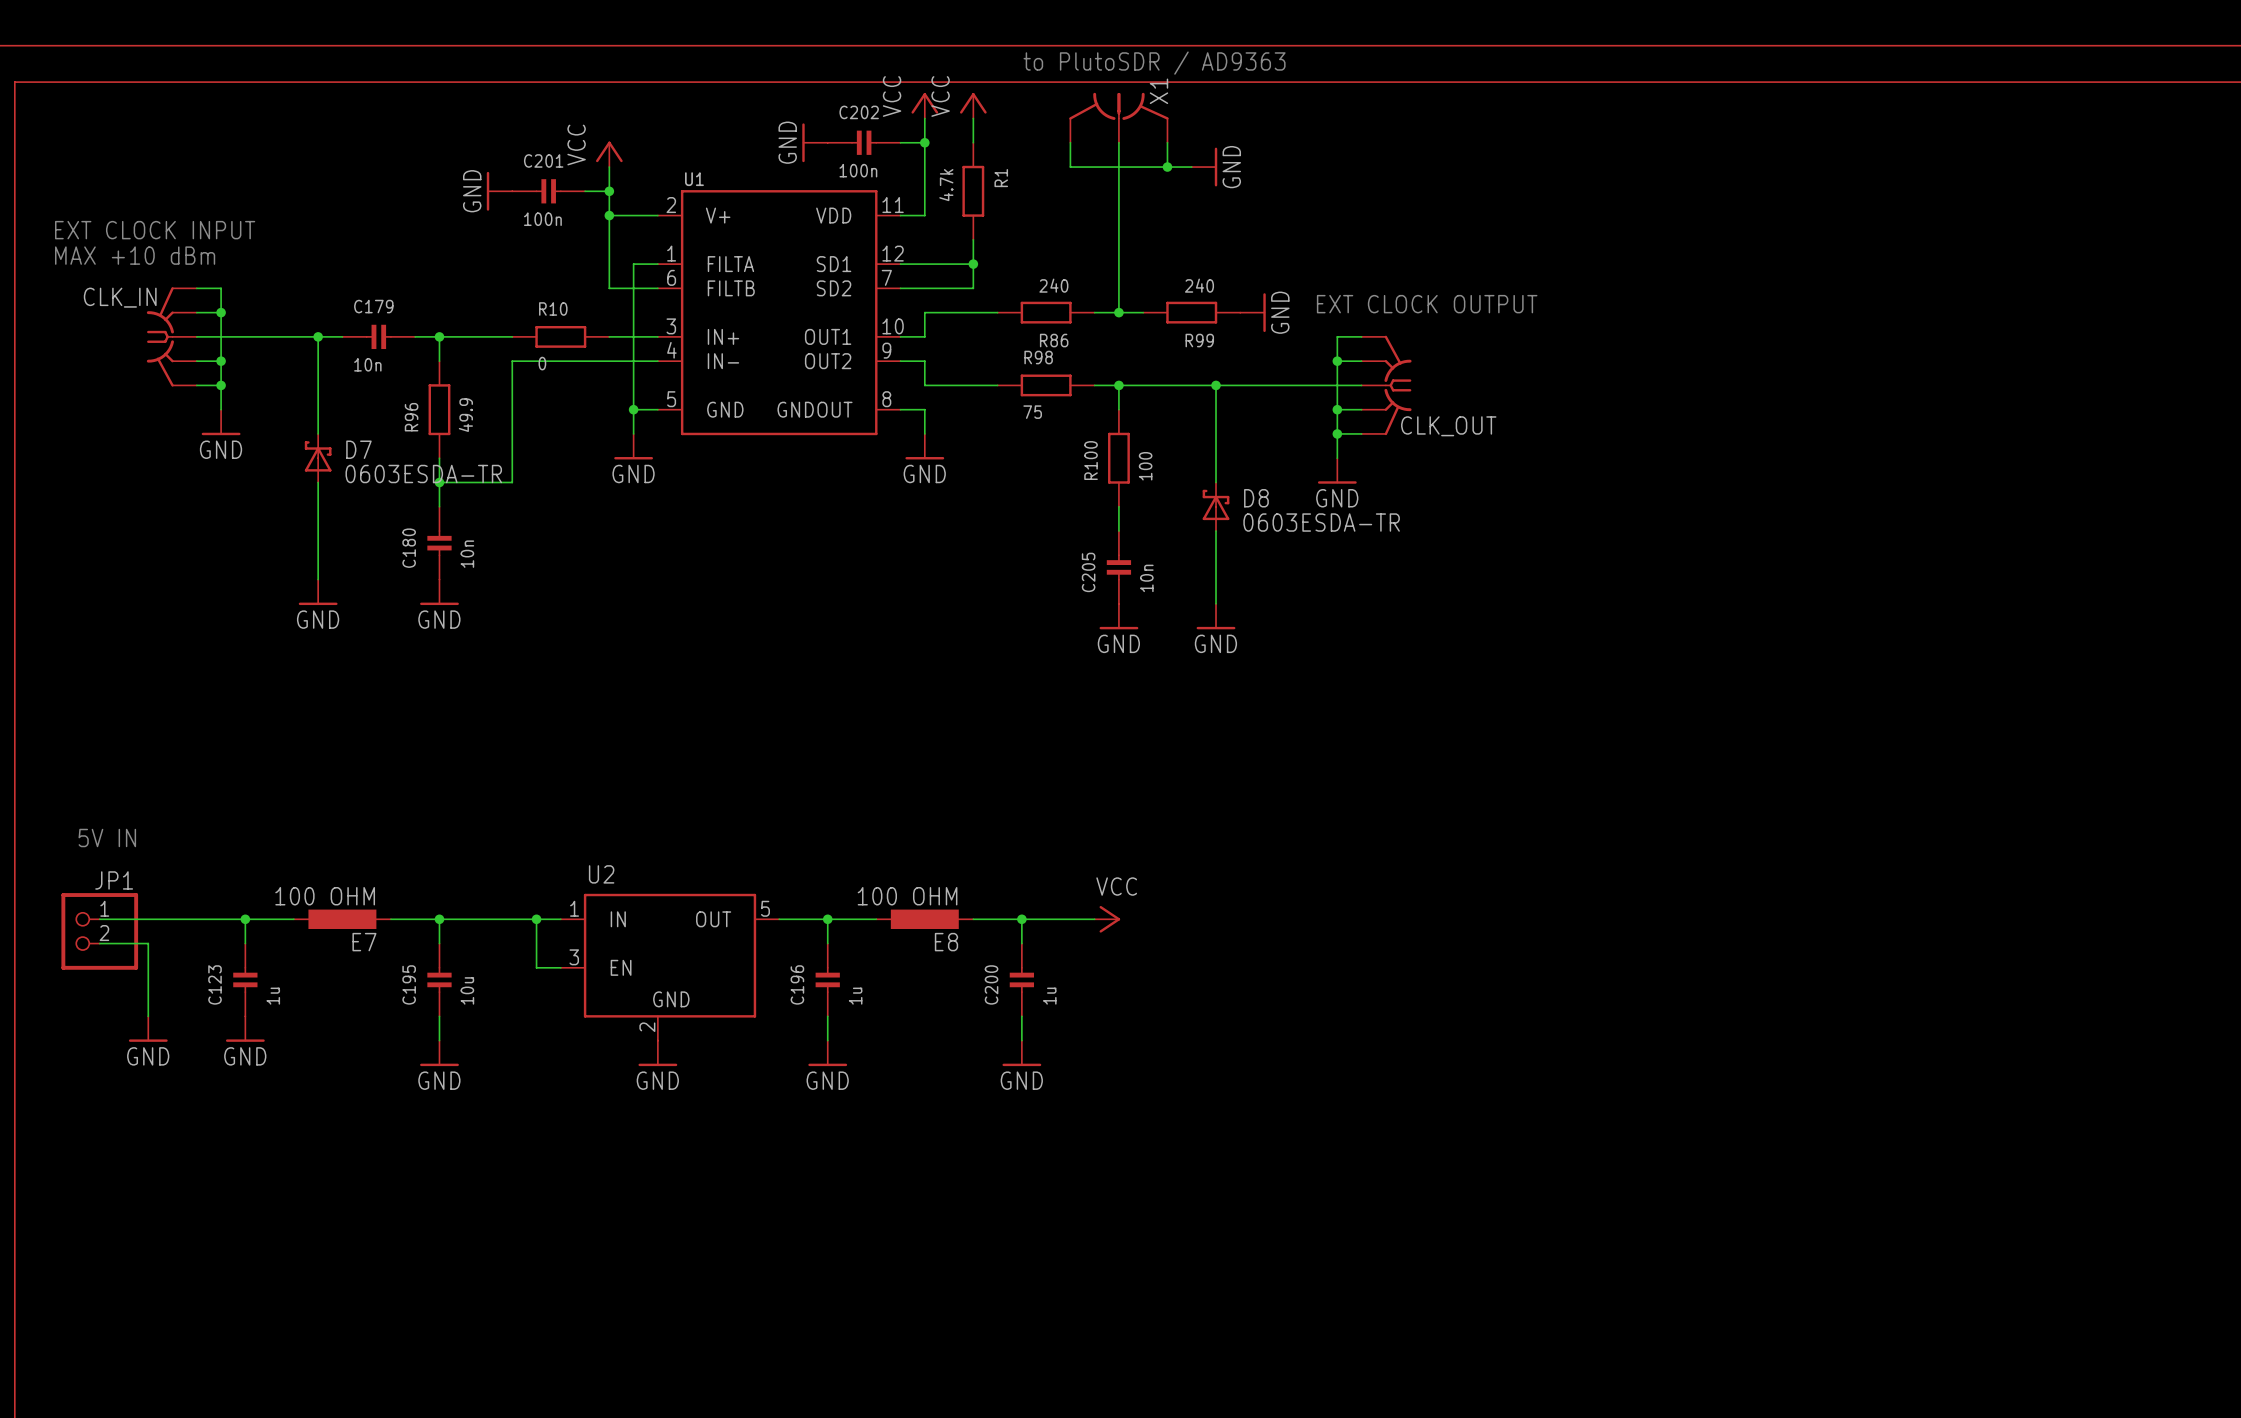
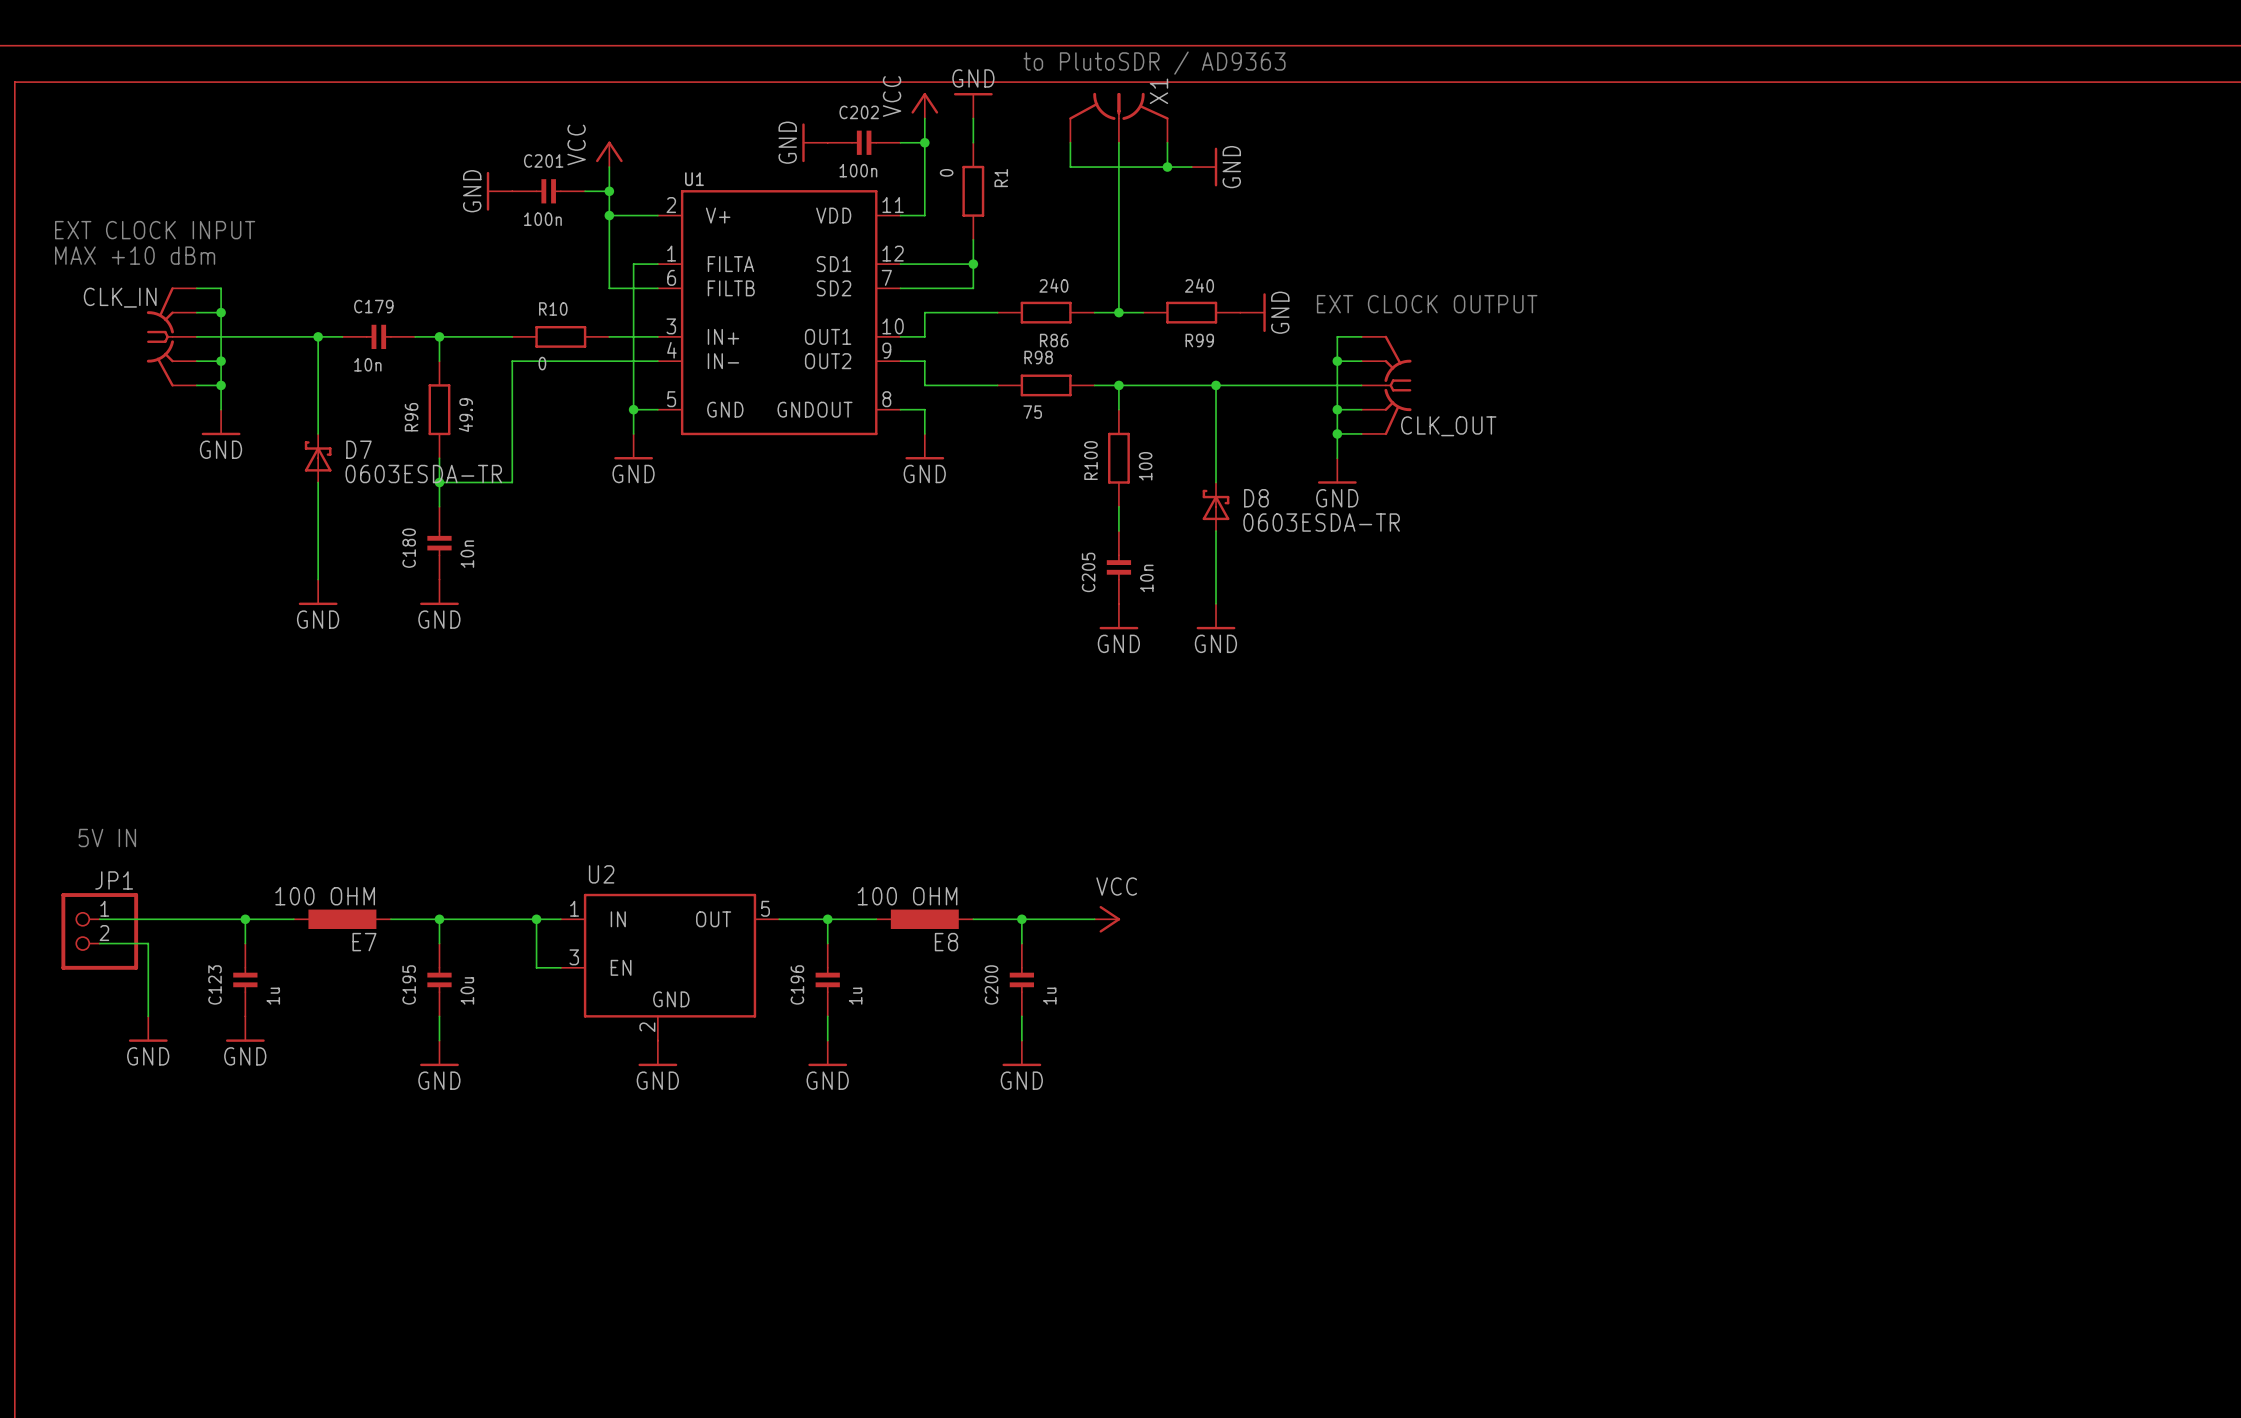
power symbol: VCC (973, 105) -> GND (973, 105)
R1 value: 4.7k (946, 185) -> 0 (946, 172)

